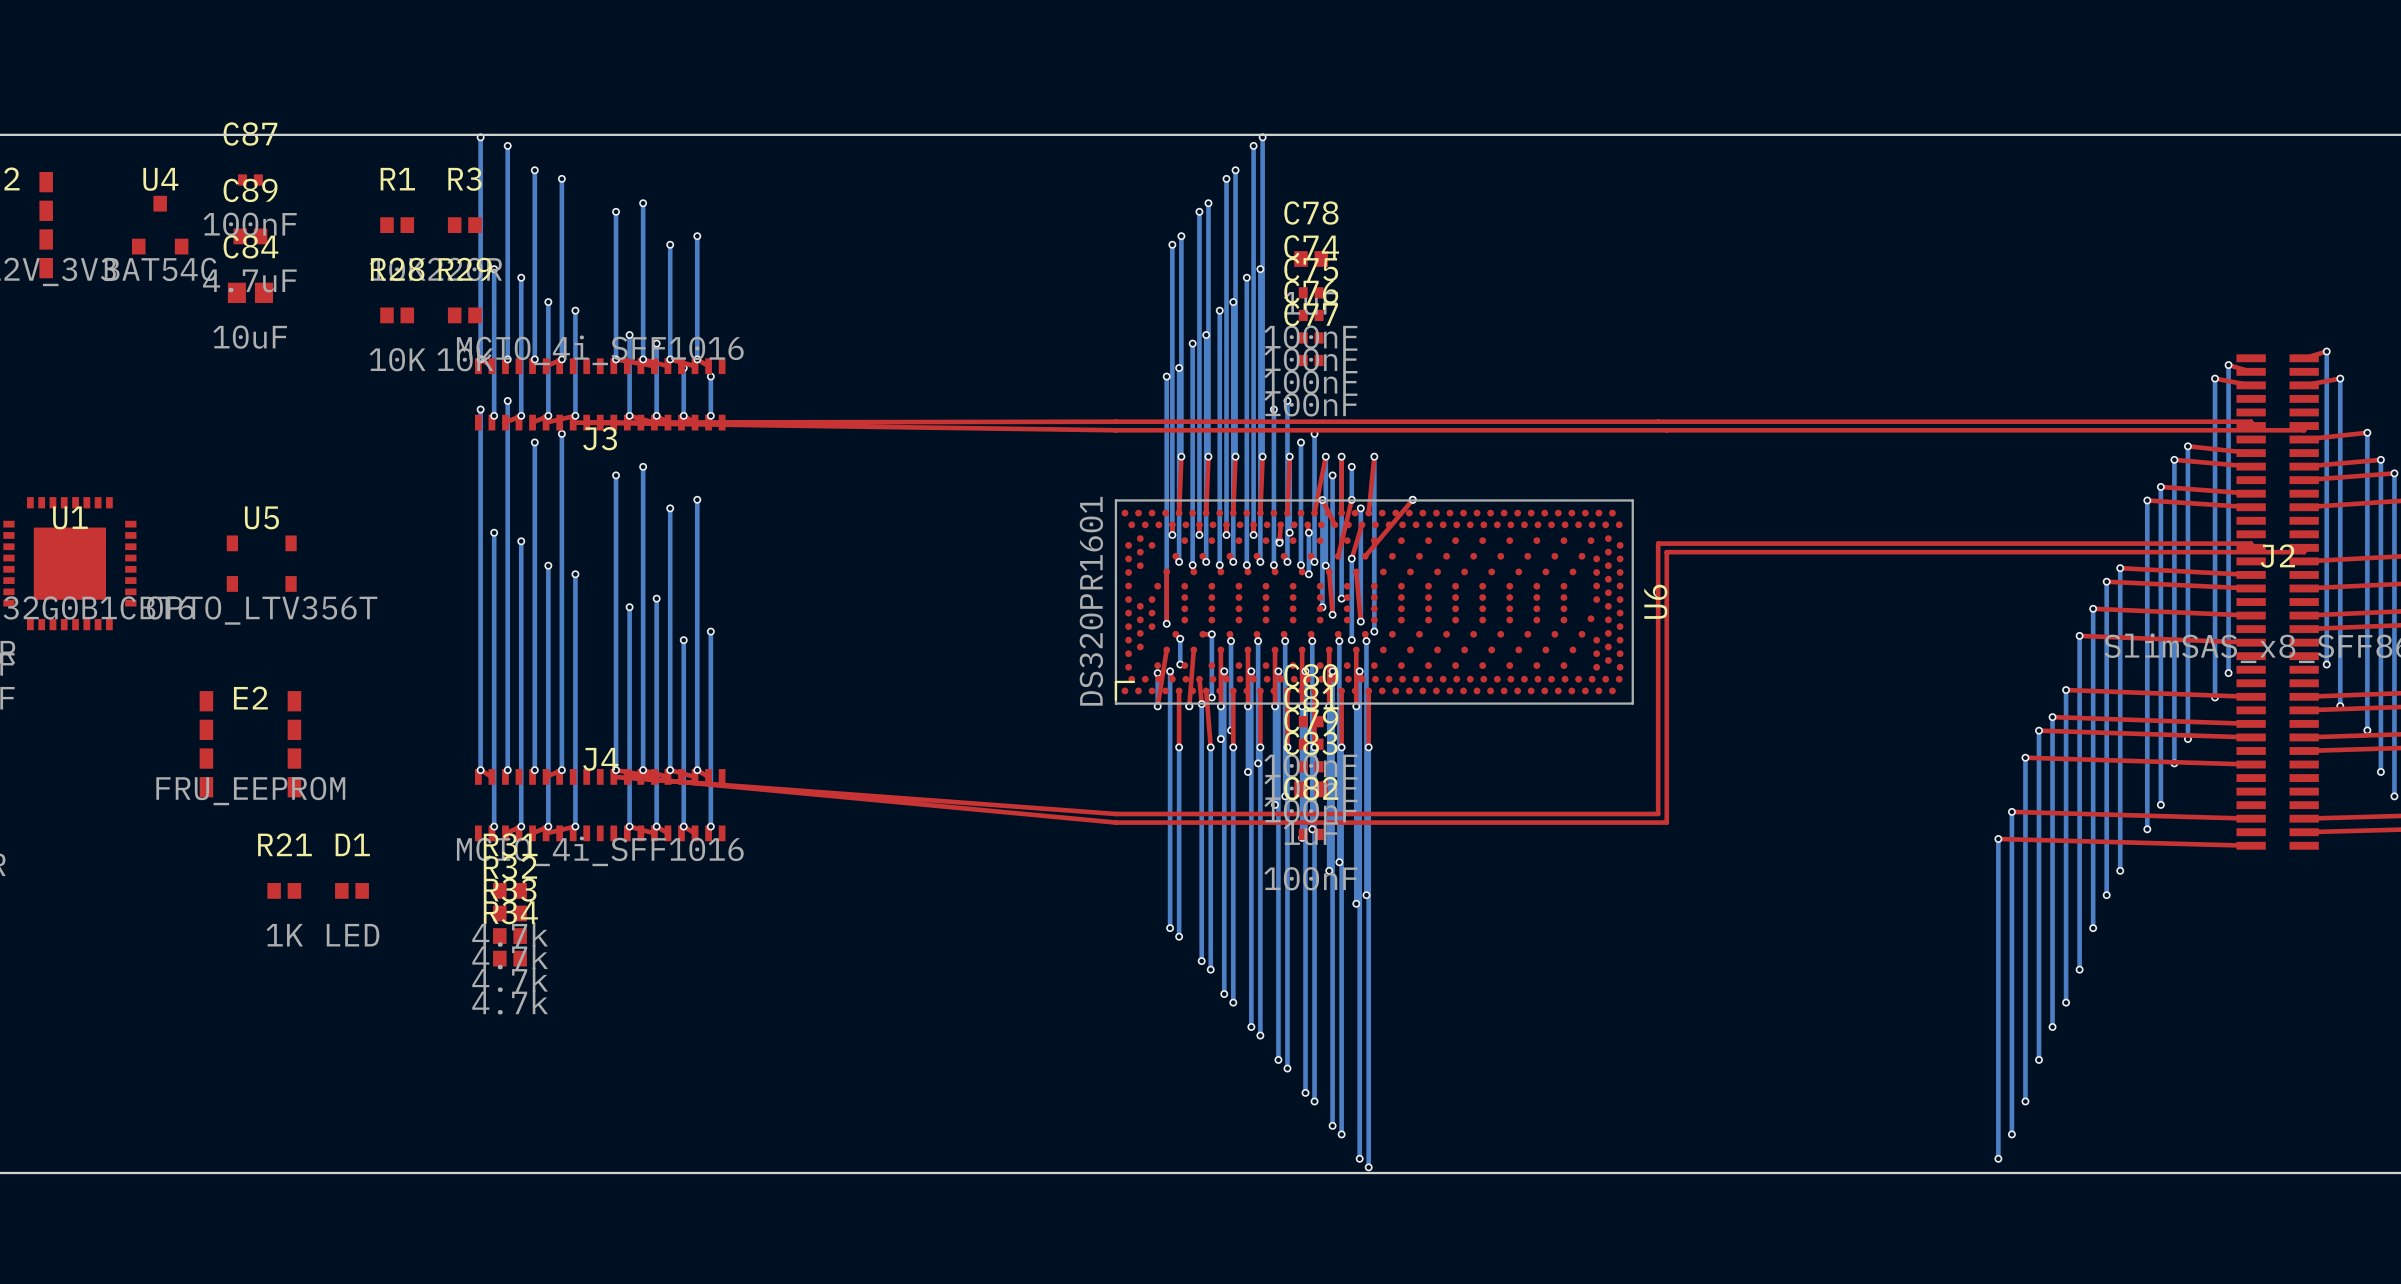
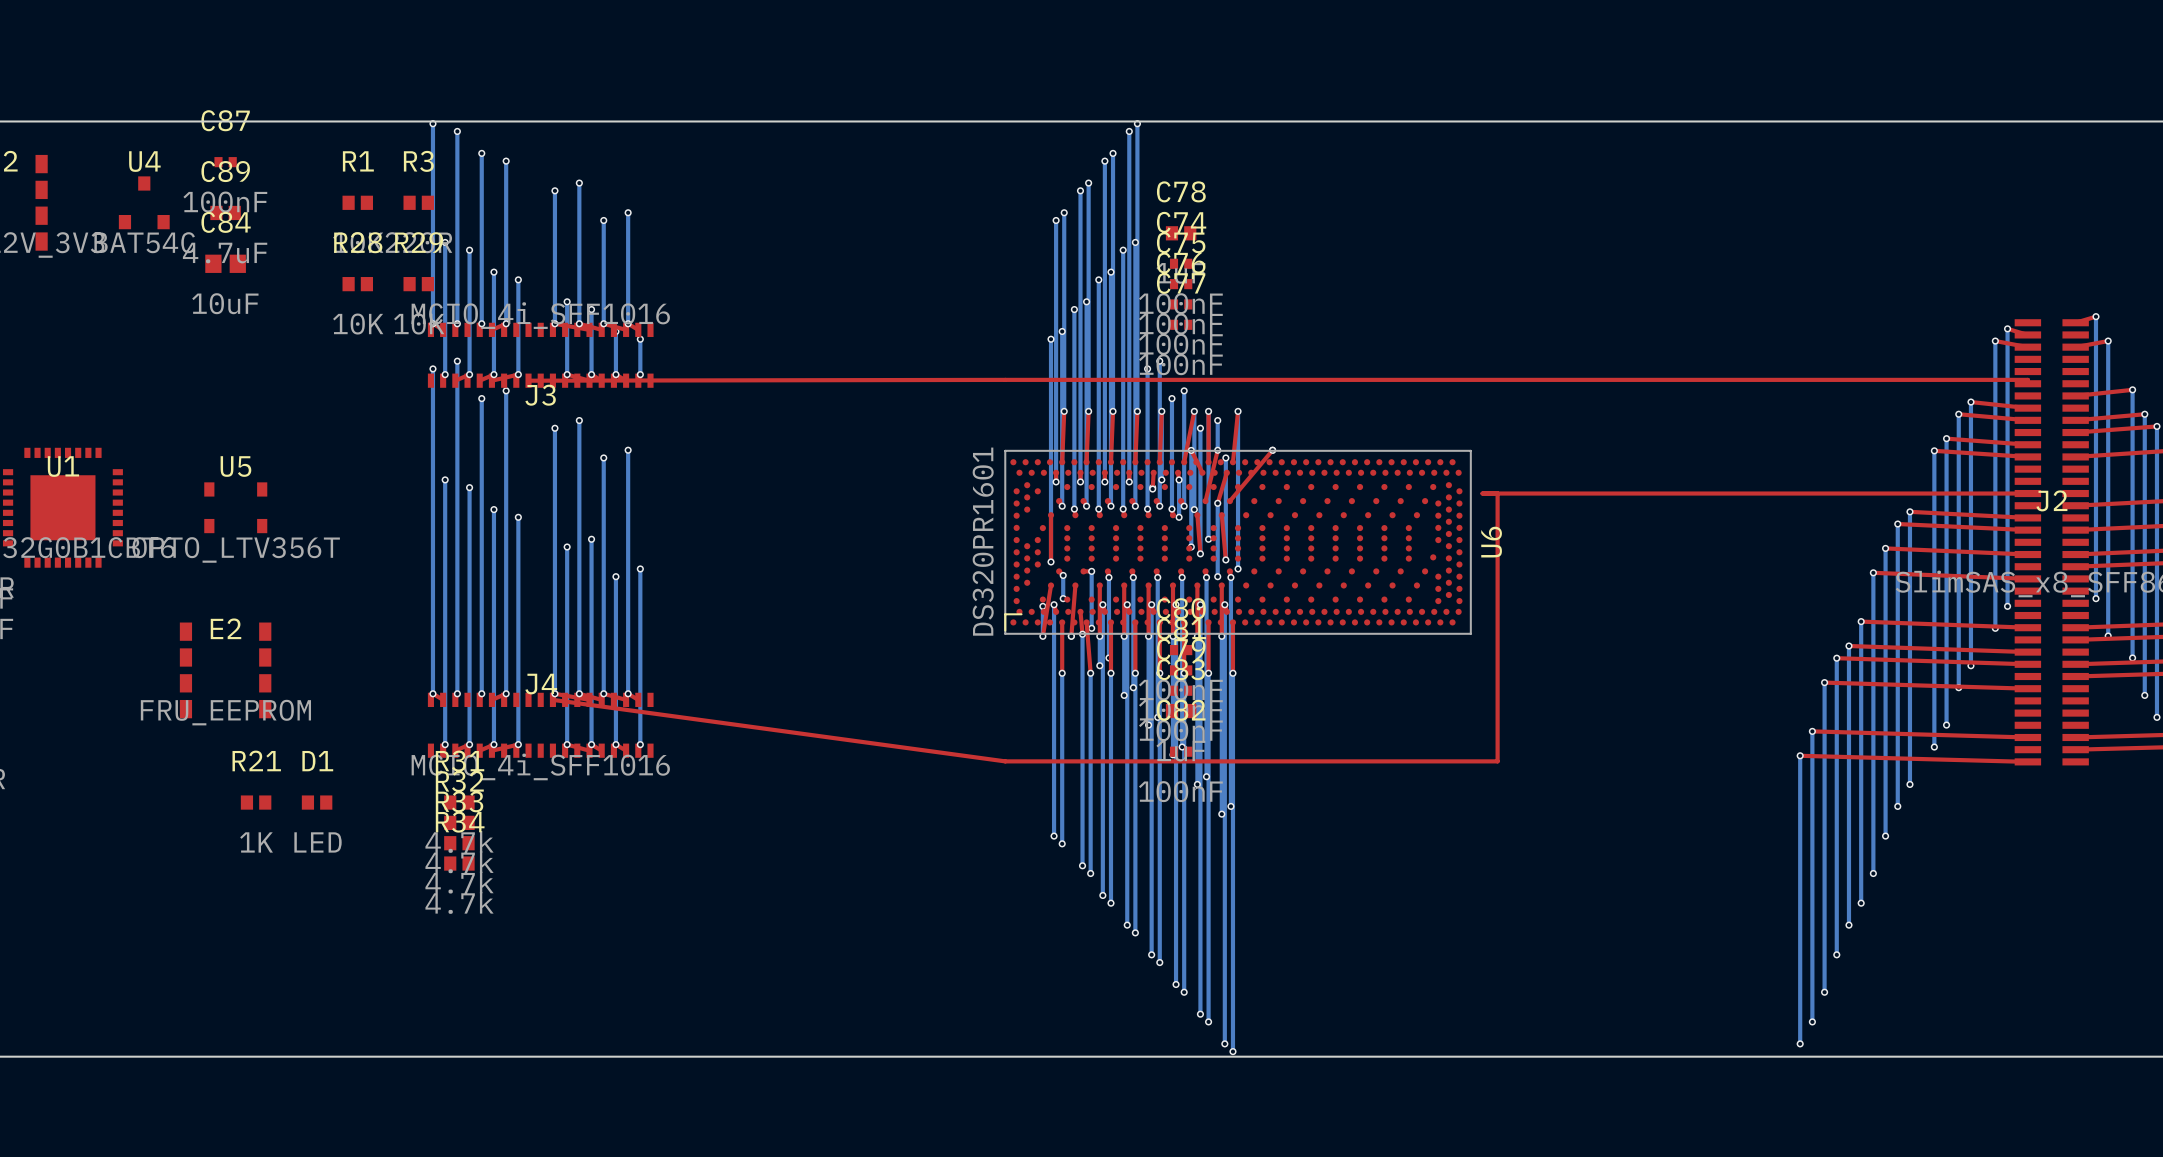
top track: (573, 422) (1115, 430) (2304, 430) (2304, 425) -> none
top track: none -> (1482, 493) (2027, 493)
top track: (2251, 547) (2251, 543) (1658, 543) (1658, 813) (1115, 813) (613, 776) -> (1497, 493) (1497, 761) (1005, 761) (552, 699)
top track: (2304, 547) (2304, 552) (1666, 552) (1666, 822) (1115, 822) (627, 776) -> none

